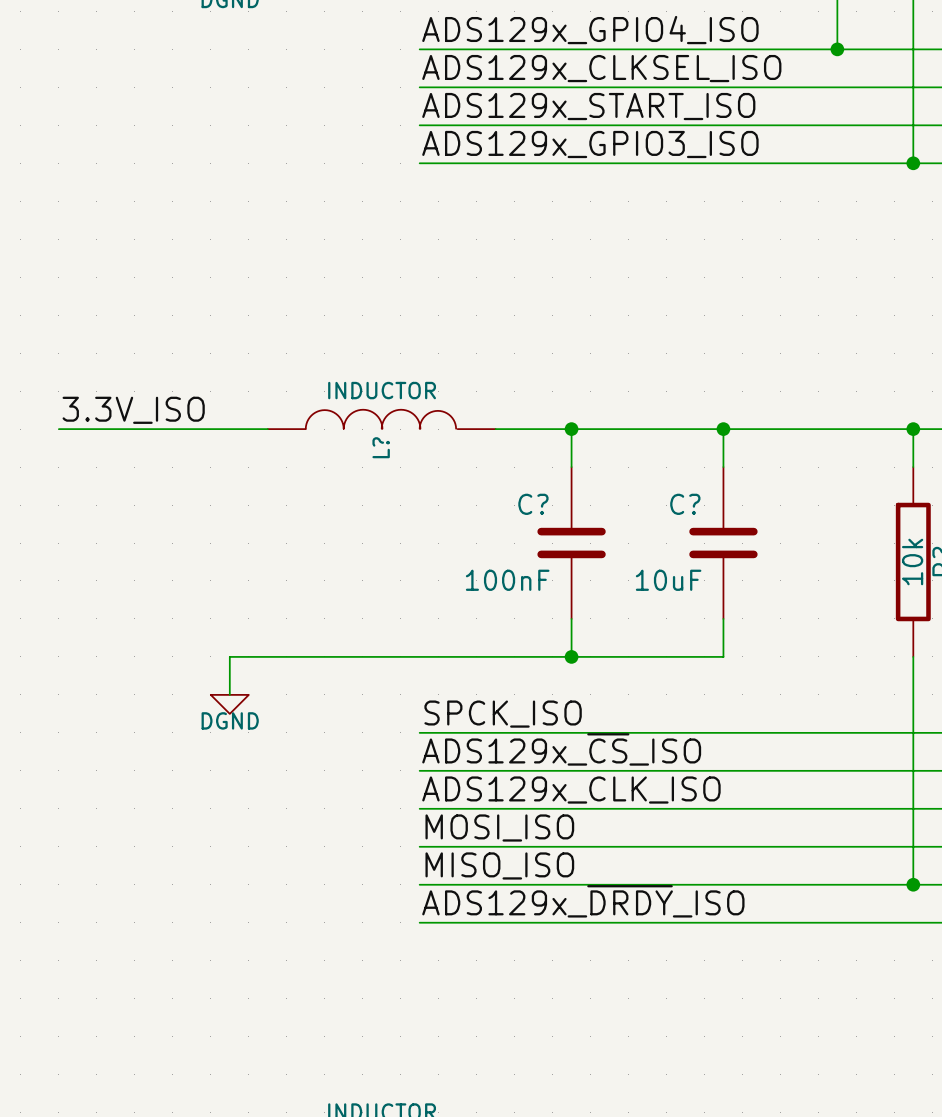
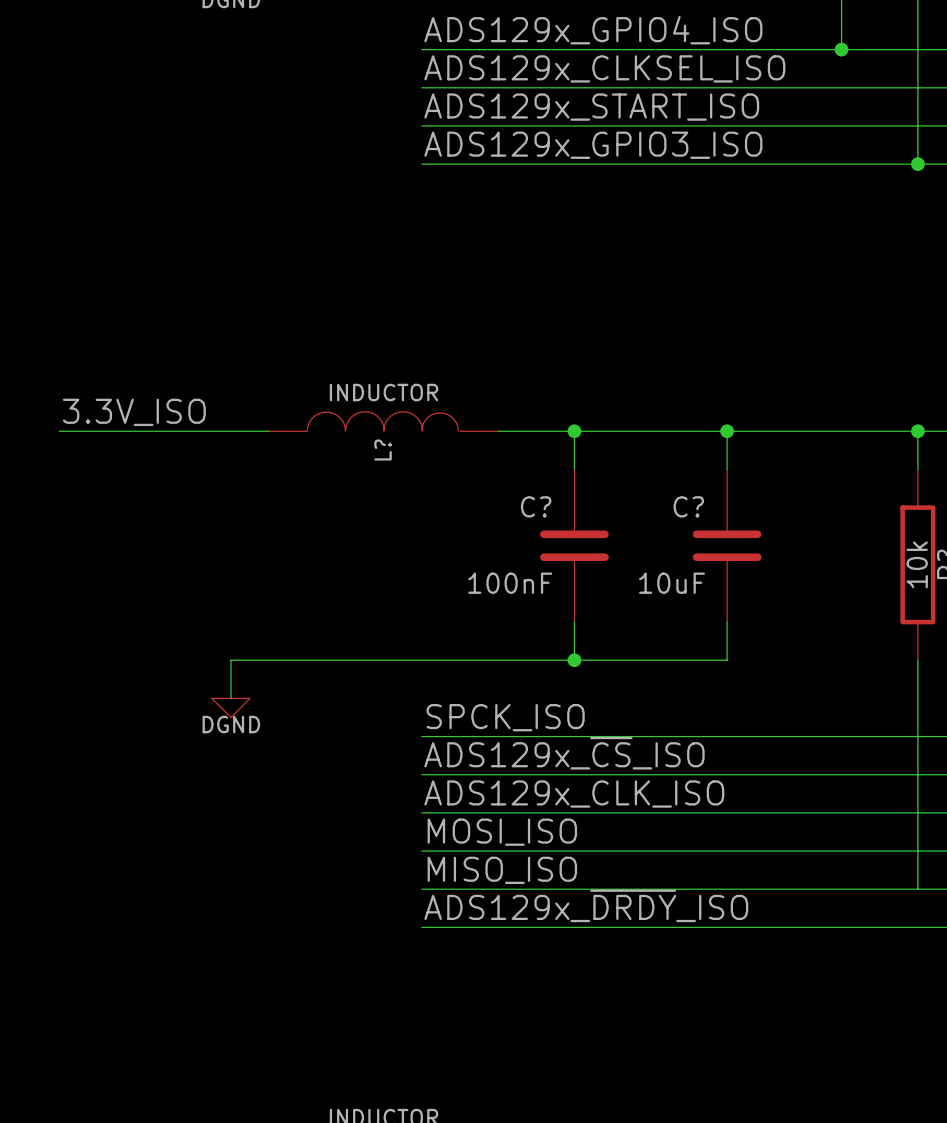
junction: (913, 884) -> none

